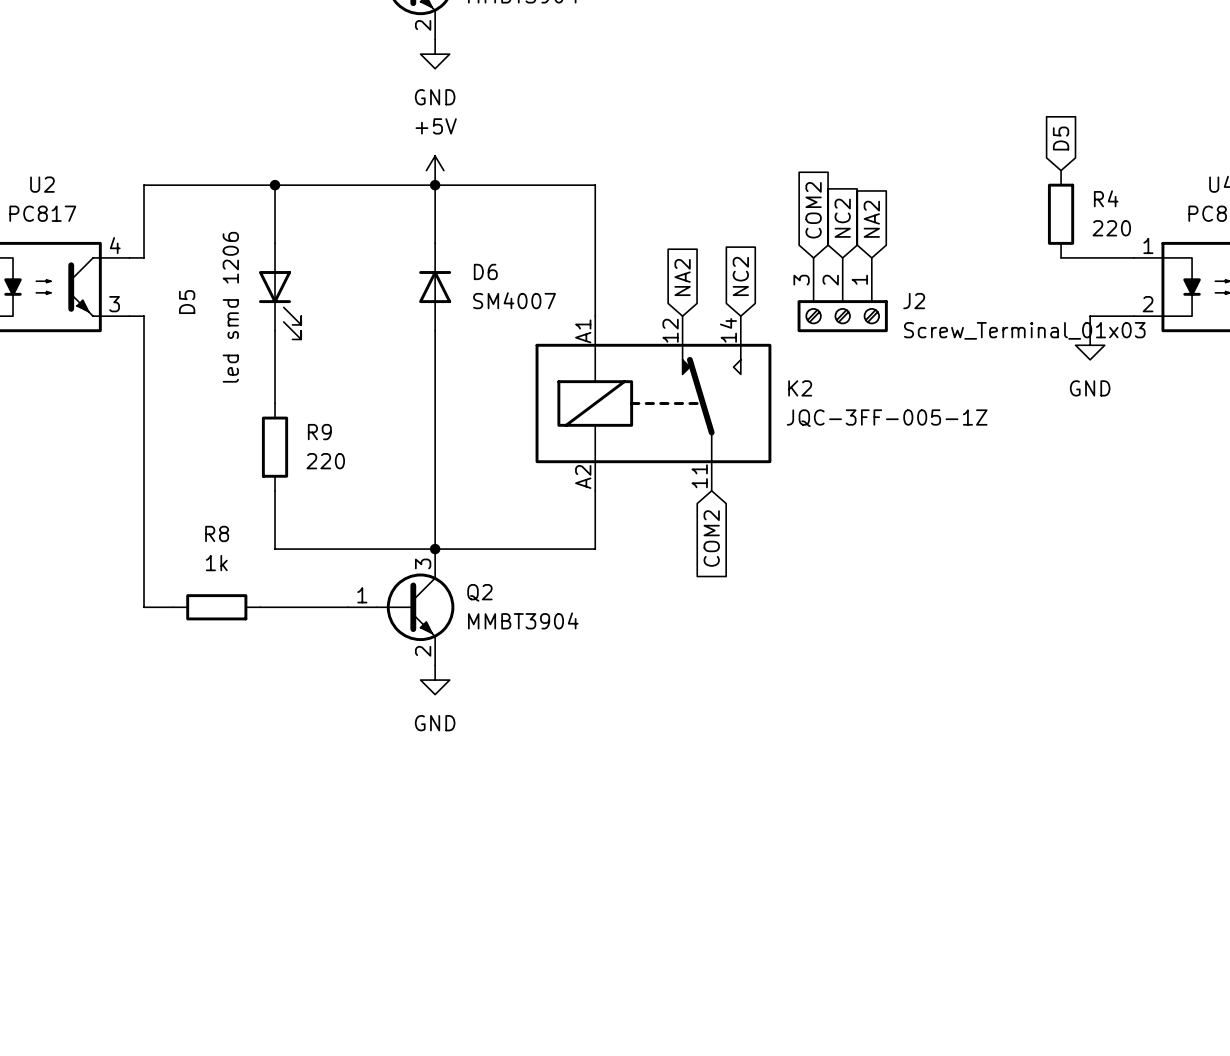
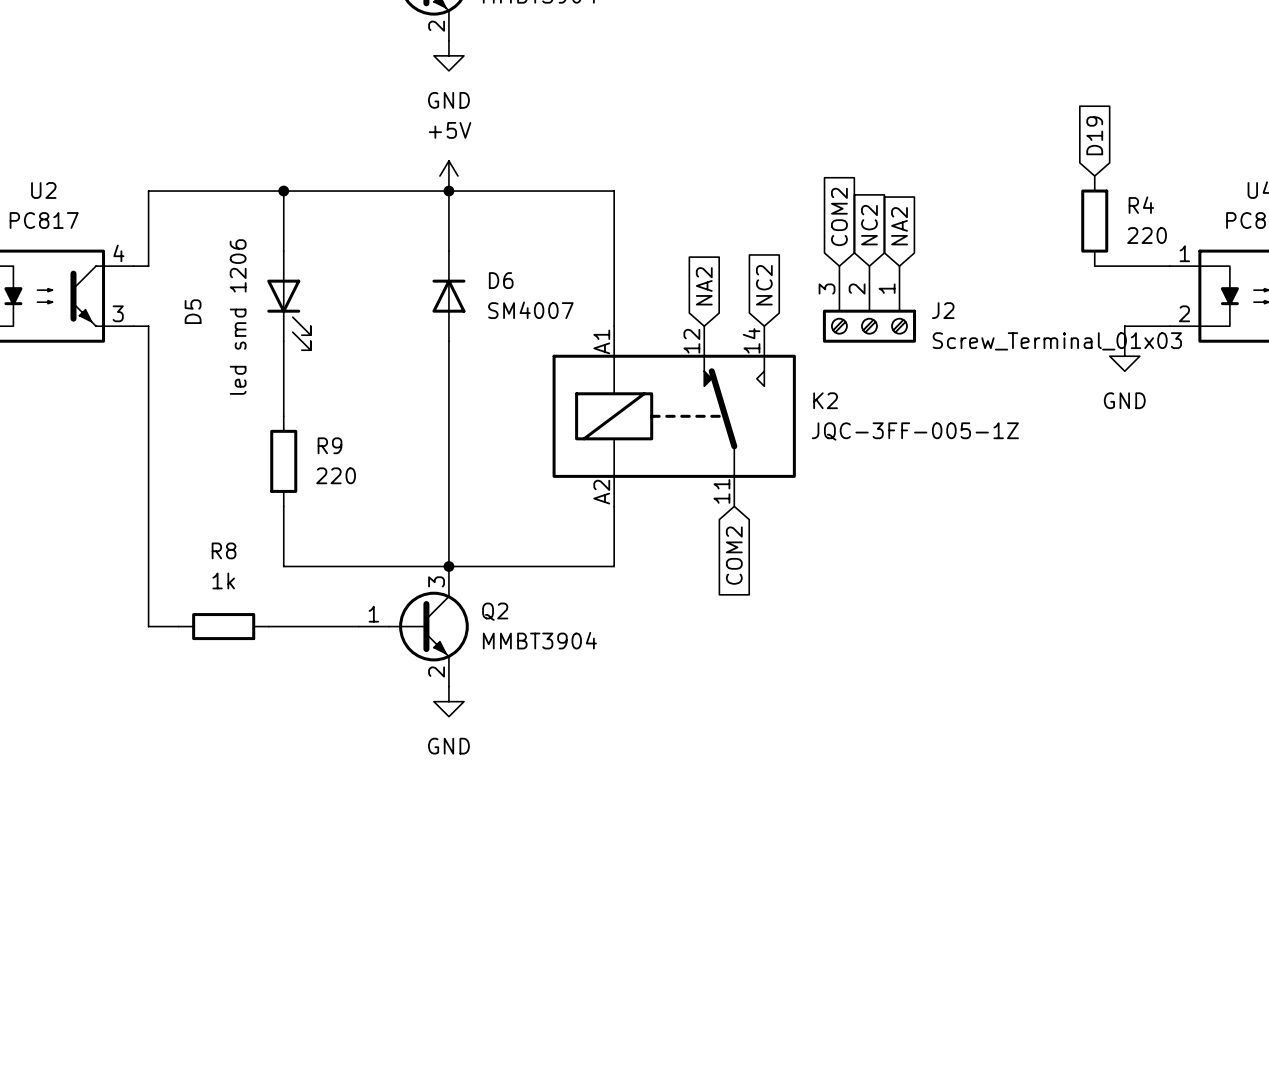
global label: D5 (1061, 138) -> D19 (1094, 135)

